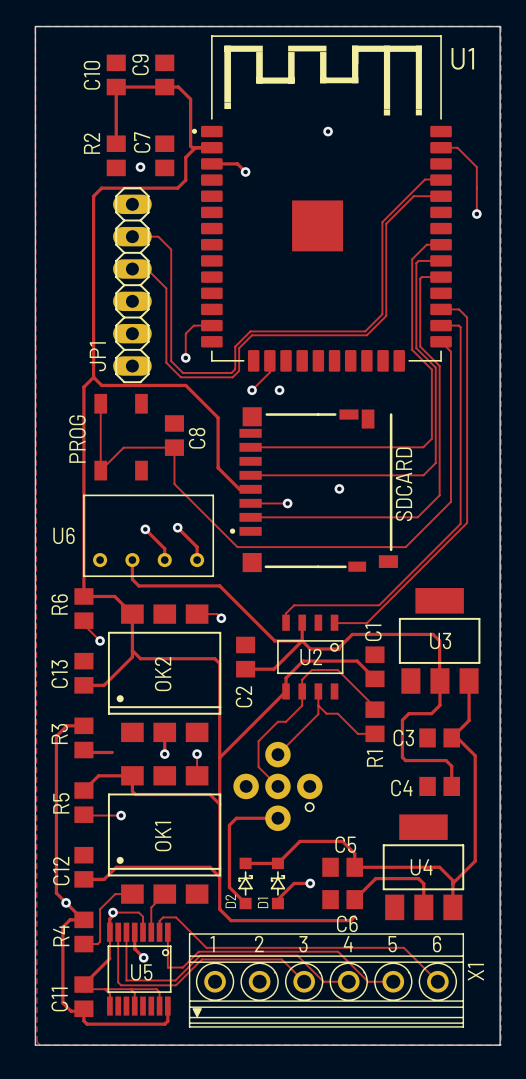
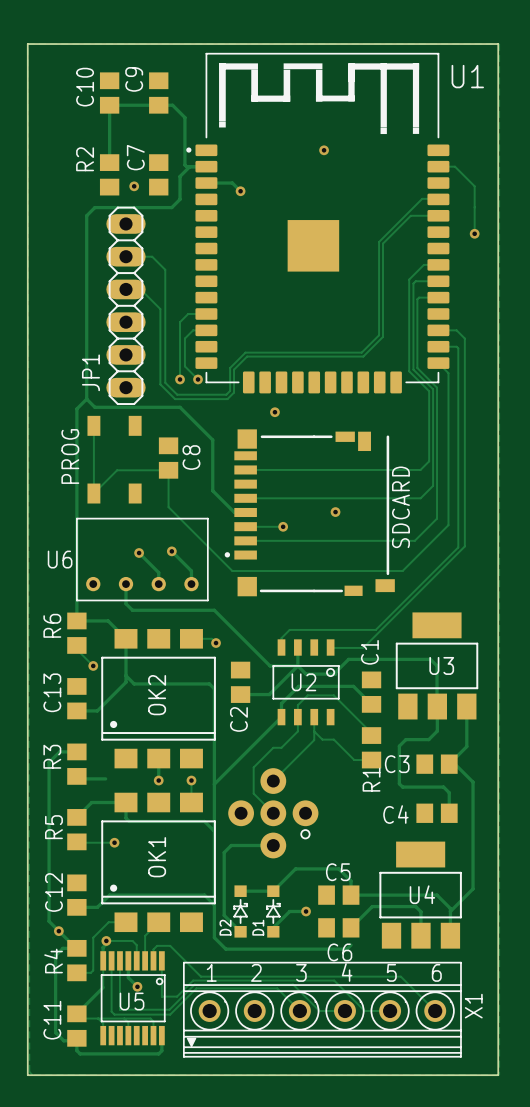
track: none -> (206, 330) (193, 330) (184, 338) (184, 366) (198, 379)
track: (211, 325) (193, 325) (185, 333) -> (206, 314) (188, 314) (180, 322) (180, 354)
track: (269, 360) (269, 372) (252, 390) -> none
via position: (252, 390) -> (198, 379)

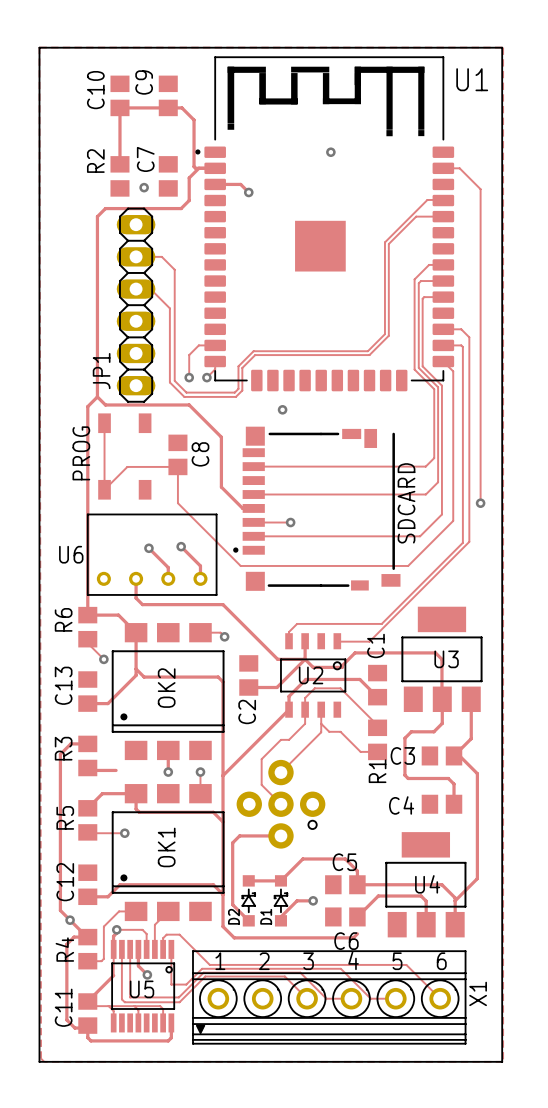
track: (474, 186) (474, 233) -> (479, 187) (480, 189) (480, 503)
via: (474, 233) -> none
track: (206, 314) (188, 314) (180, 322) (180, 356) -> (215, 345) (198, 345) (189, 355)
track: (206, 330) (193, 330) (184, 338) (184, 366) (198, 379) -> (215, 361) (215, 369) (206, 377)
via: none -> (480, 503)
via: (335, 512) -> none

